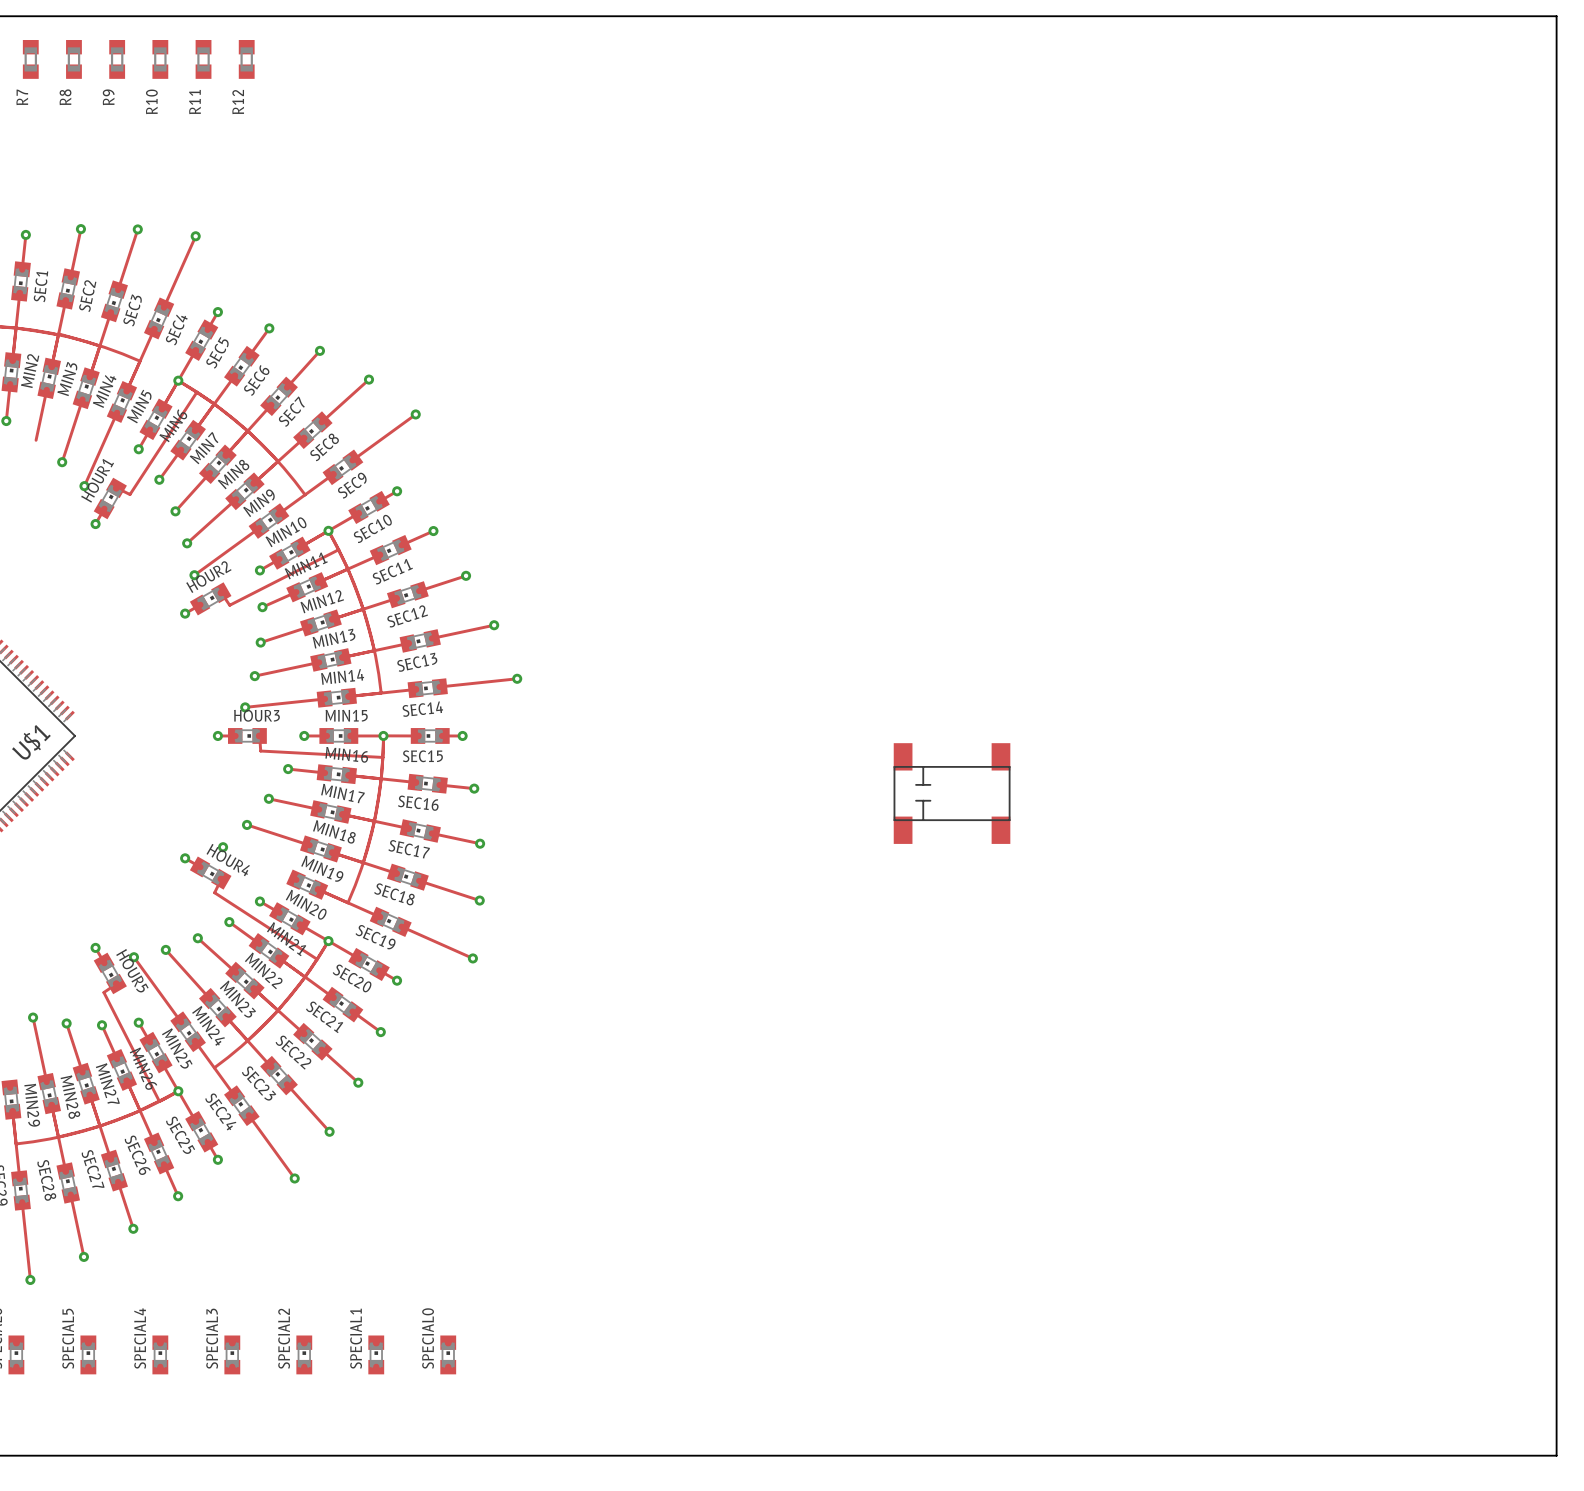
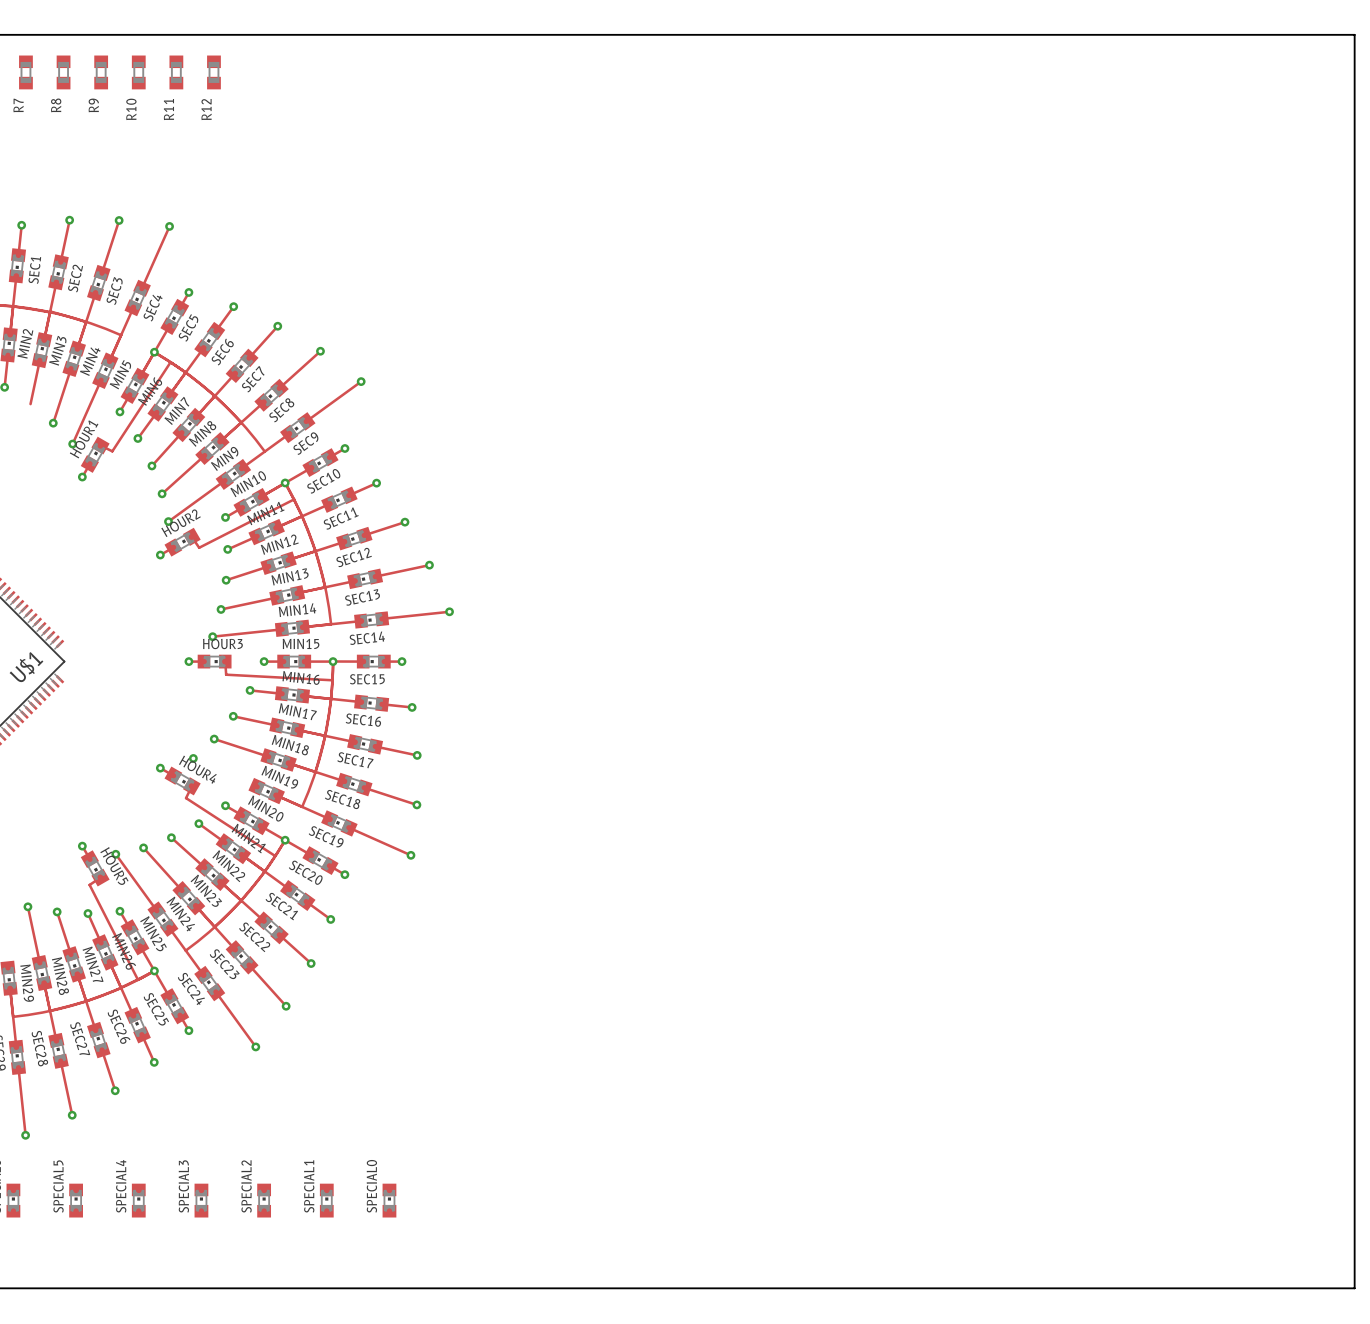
part: (952, 793) -> none

